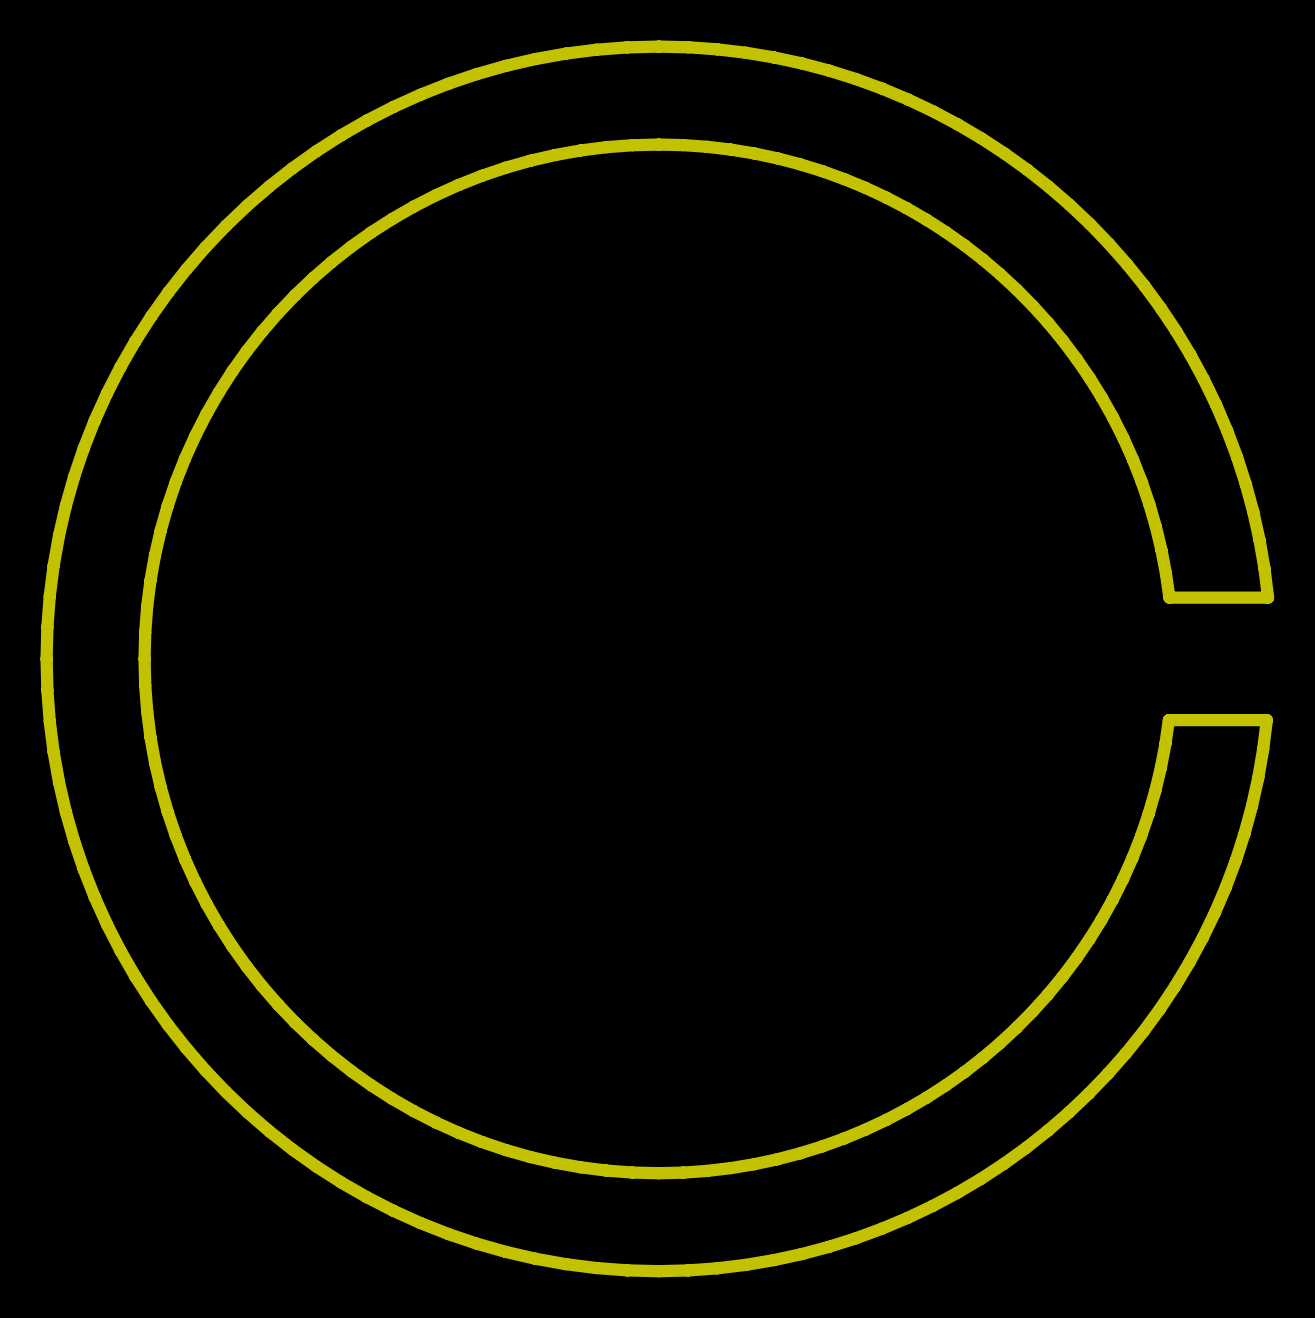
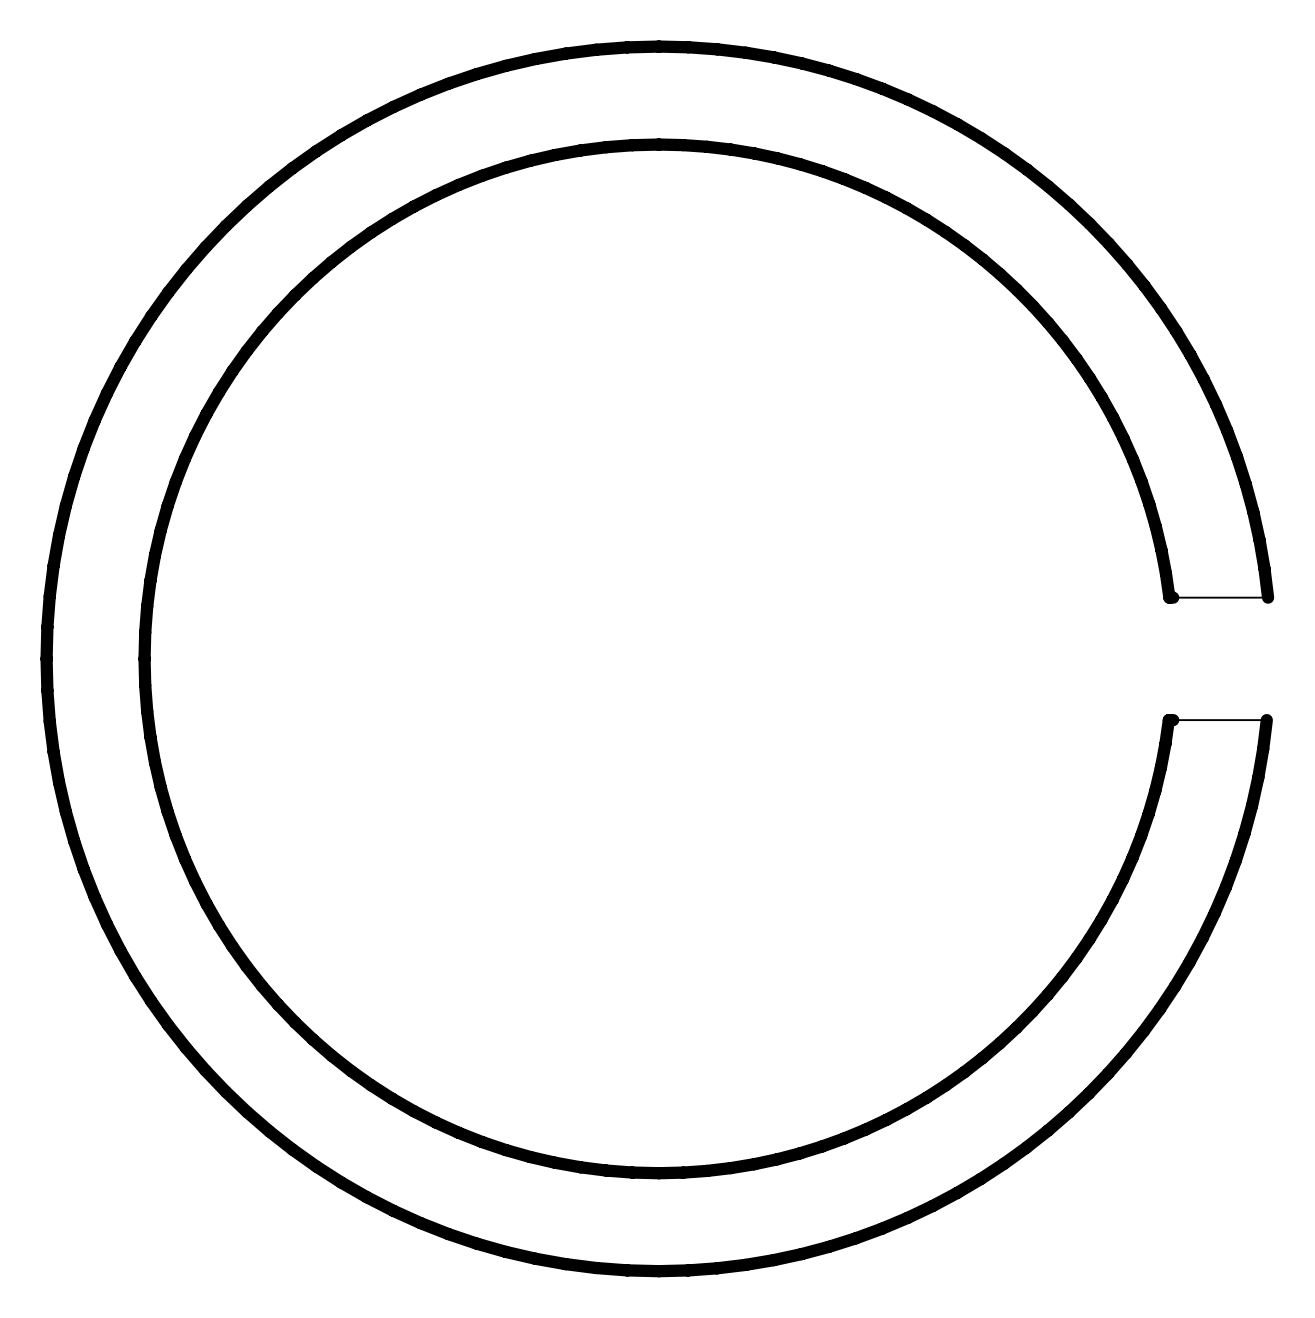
board edge width: thick (1169, 597) (1268, 597) -> thin (1169, 597) (1268, 597)
board edge width: thick (1168, 720) (1266, 720) -> thin (1168, 720) (1266, 720)

